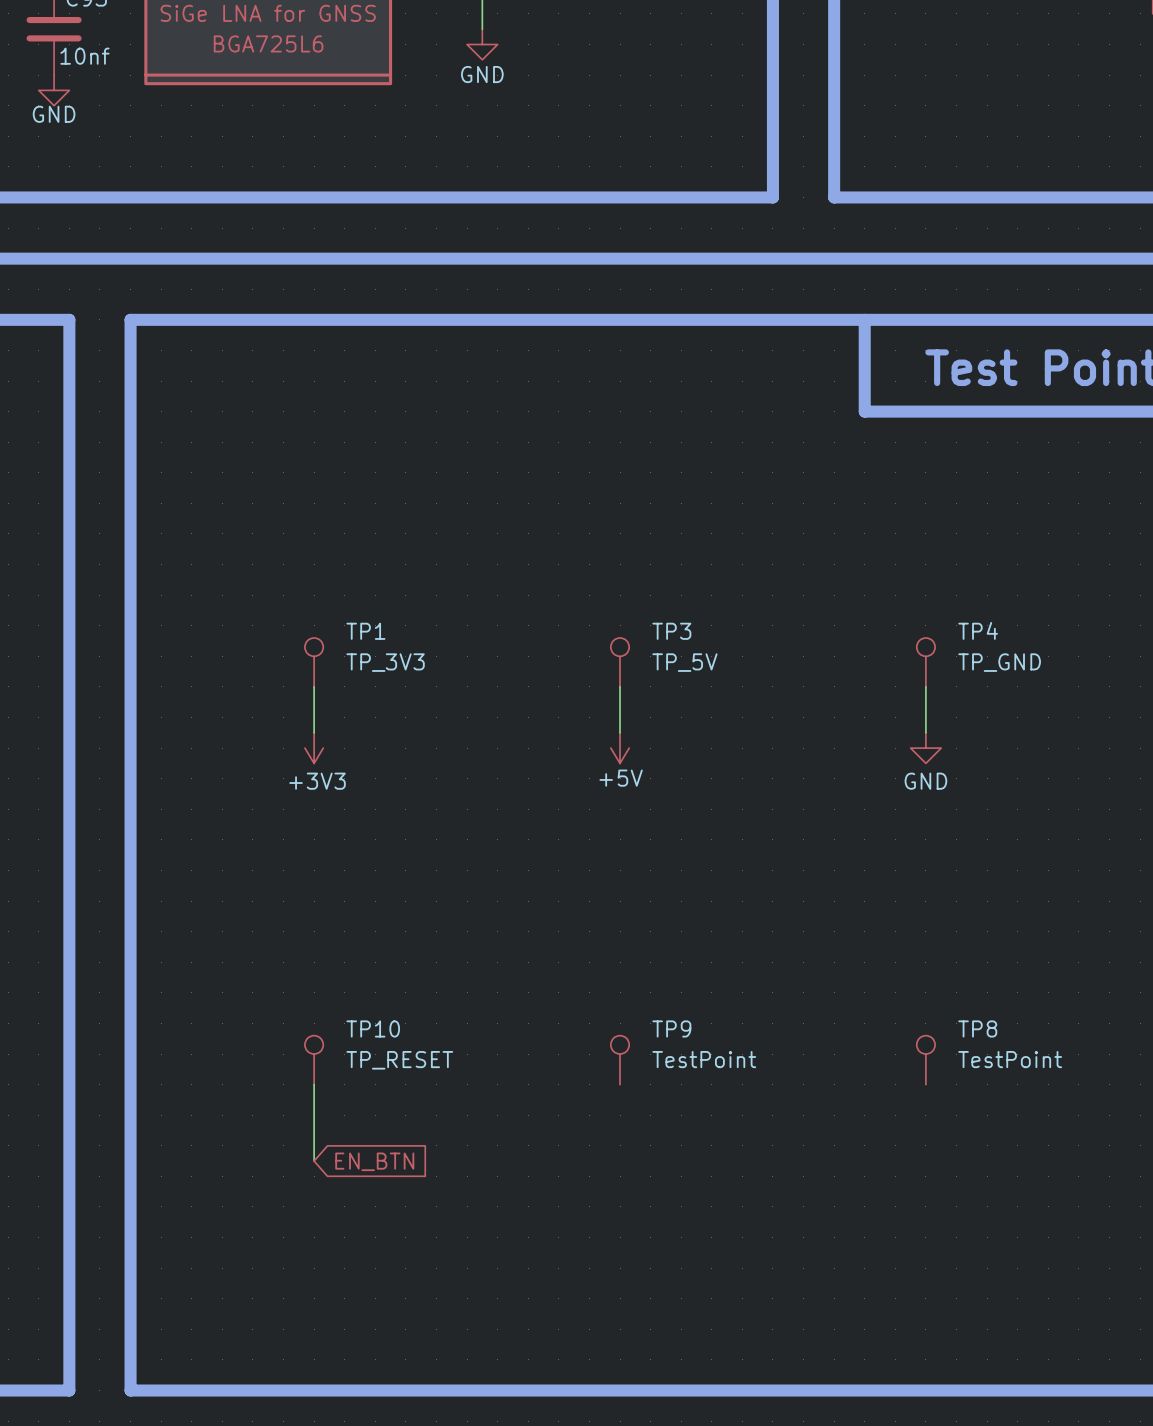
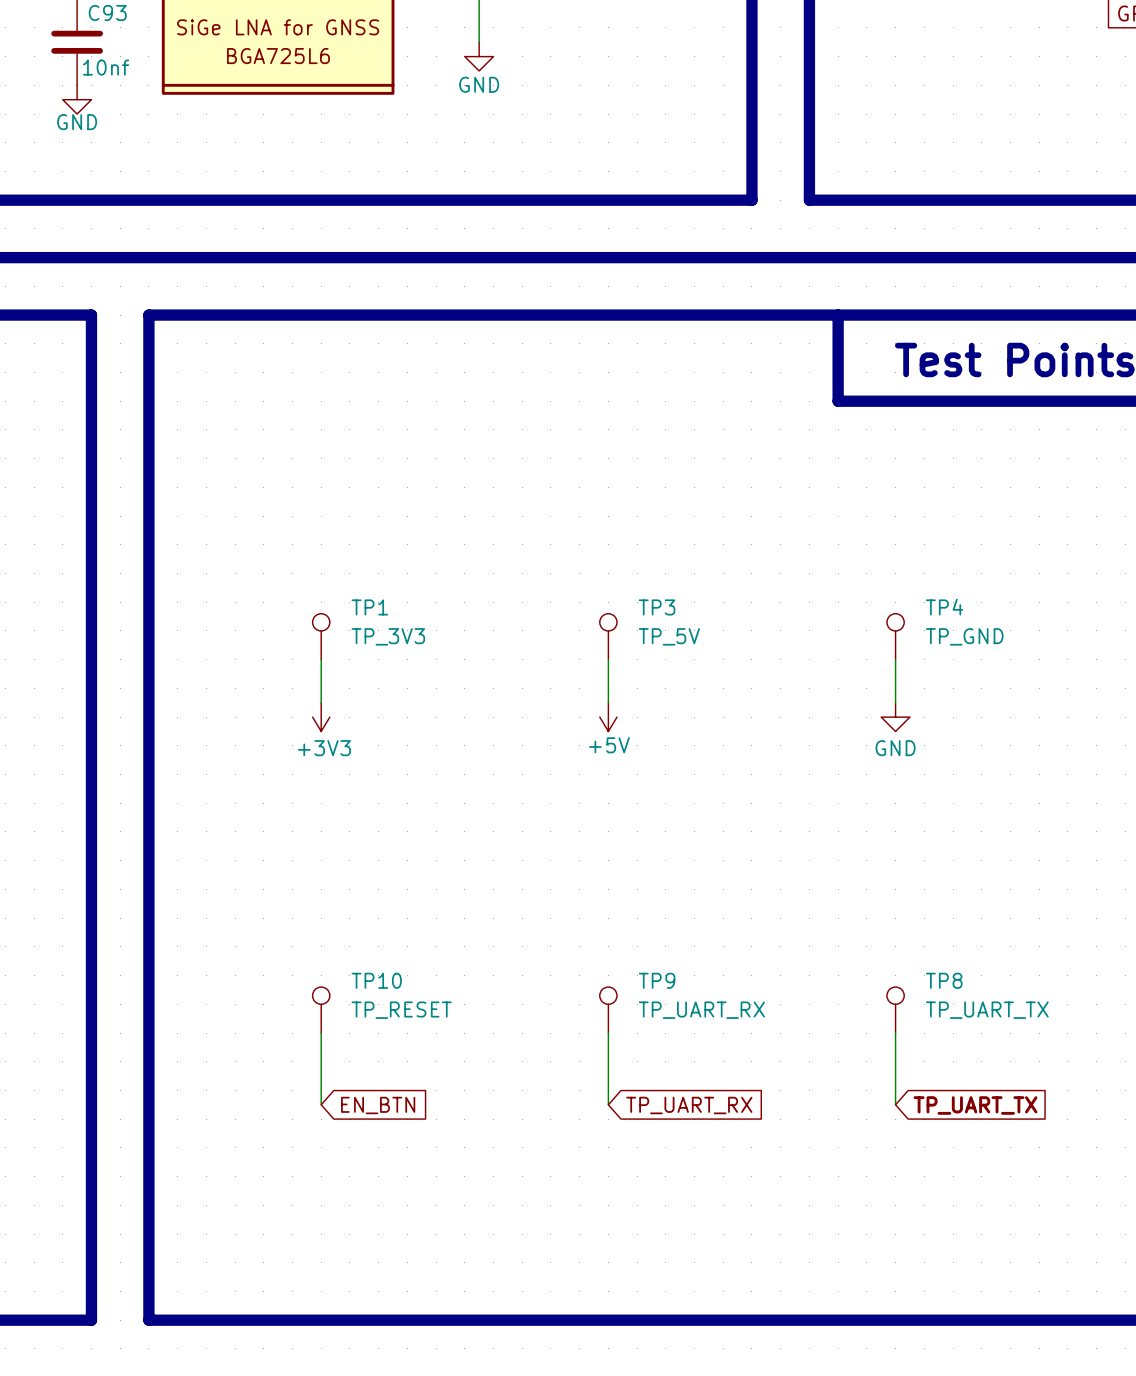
TP9 value: TestPoint (704, 1059) -> TP_UART_RX (701, 1010)
TP8 value: TestPoint (1010, 1059) -> TP_UART_TX (987, 1010)
wire: none -> (608, 1033) (608, 1104)
wire: none -> (895, 1033) (895, 1104)
global label: none -> TP_UART_RX (689, 1105)
global label: none -> TP_UART_TX (975, 1105)

